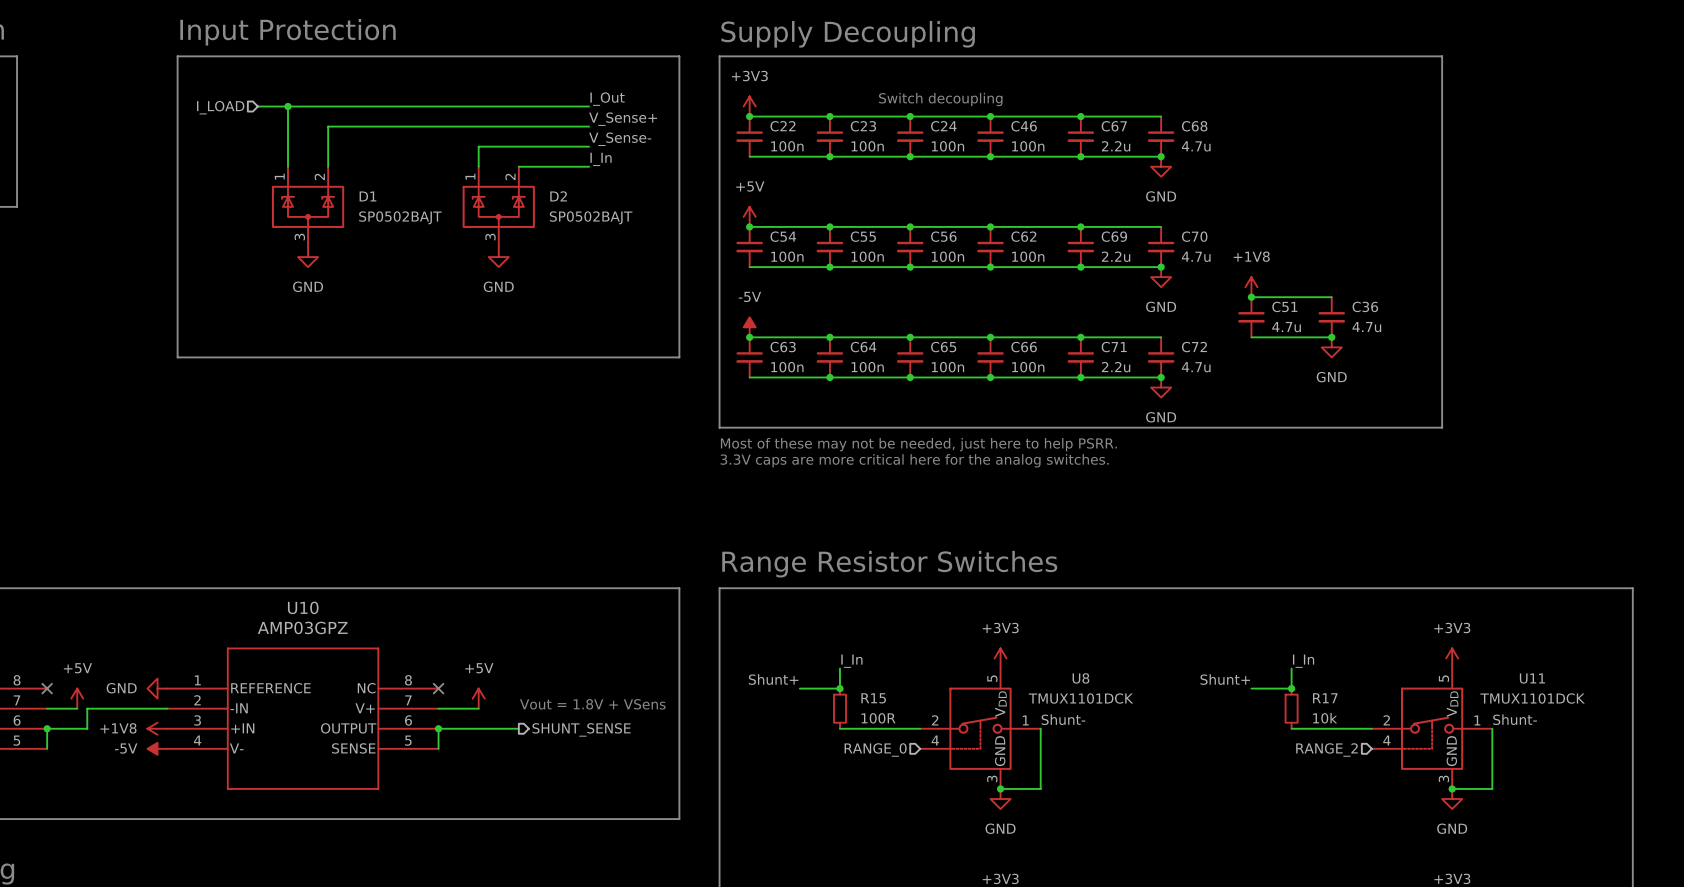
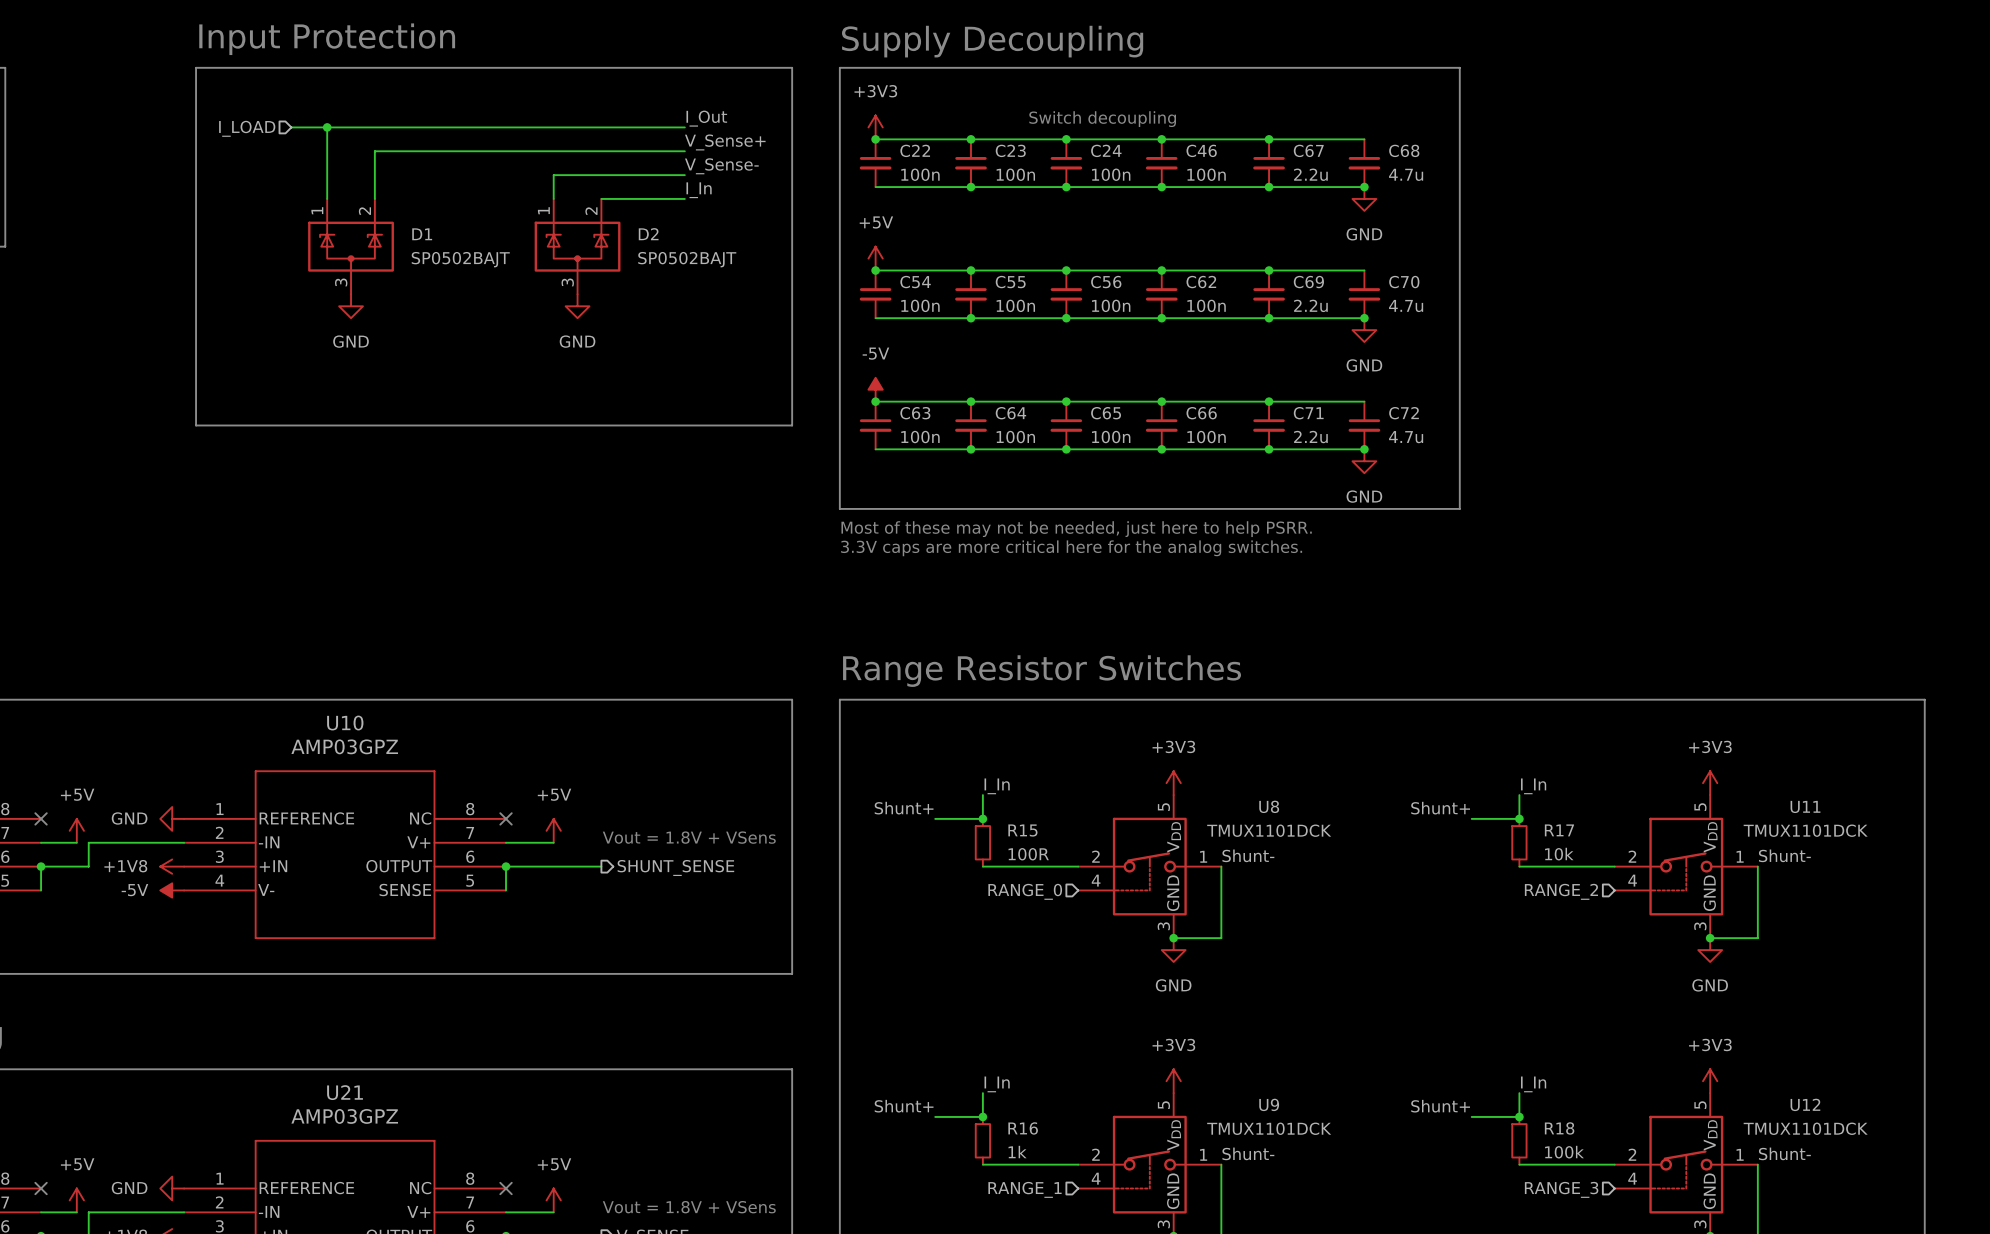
line: (1241, 56) (1442, 56) (1442, 427) (1241, 427) -> (1459, 67) (1459, 508)
power symbol: +1V8 (1251, 287) -> none
wire: (1251, 297) (1331, 297) -> none
junction: (1251, 297) -> none
C51: 4.7u (1251, 317) -> none
C36: 4.7u (1331, 317) -> none
wire: (1251, 337) (1331, 337) -> none
junction: (1331, 337) -> none
power symbol: GND (1331, 347) -> none

